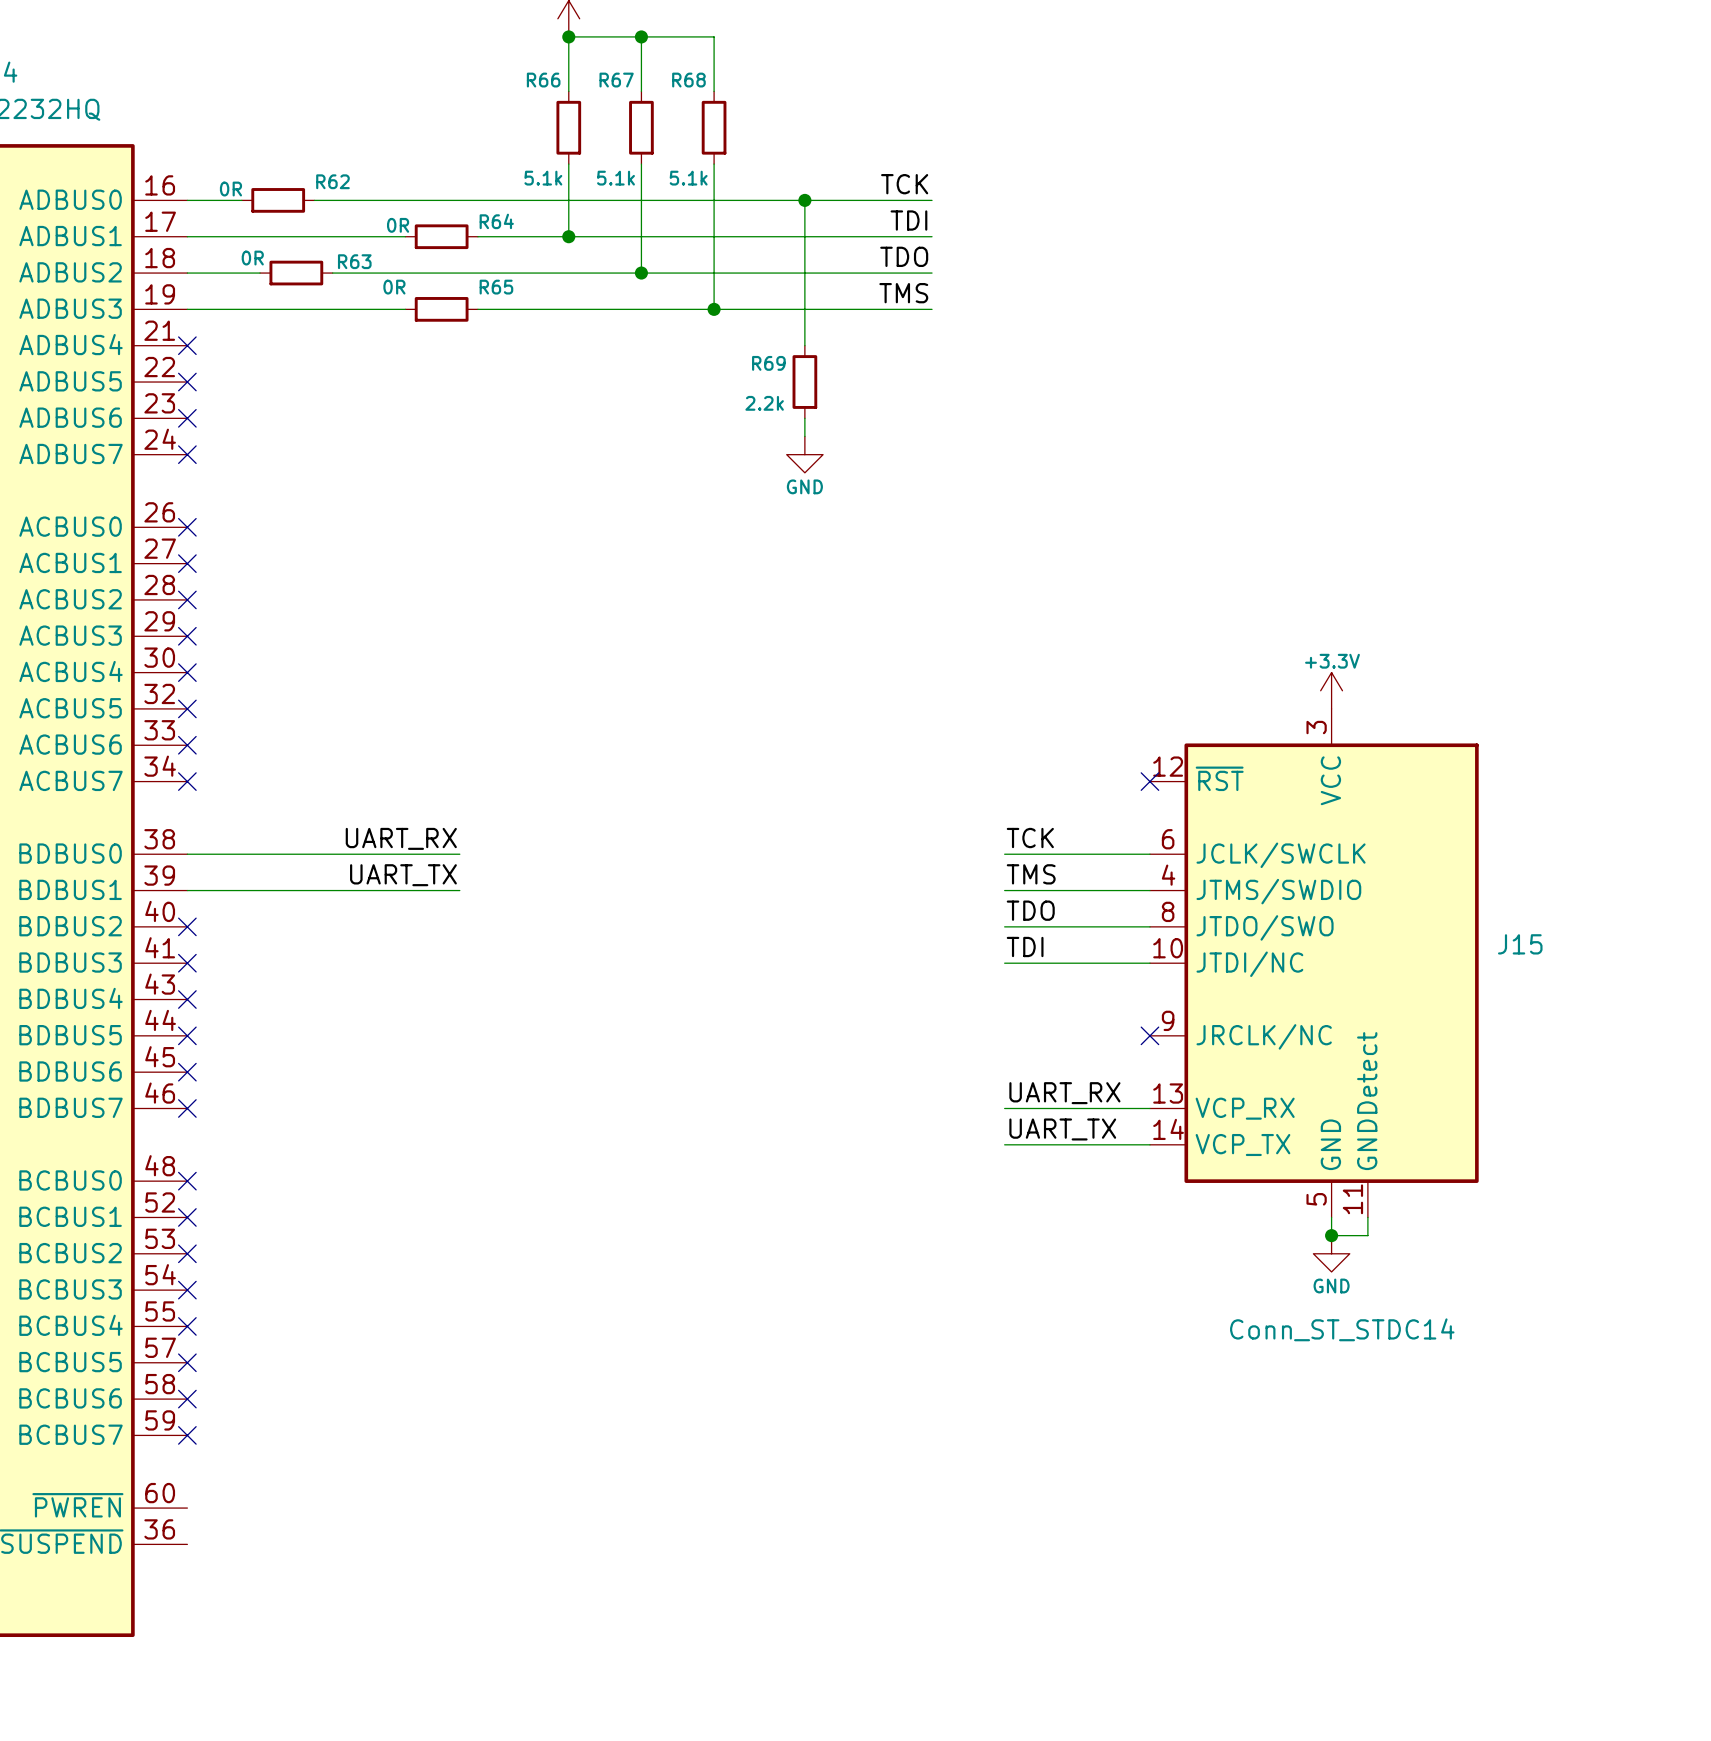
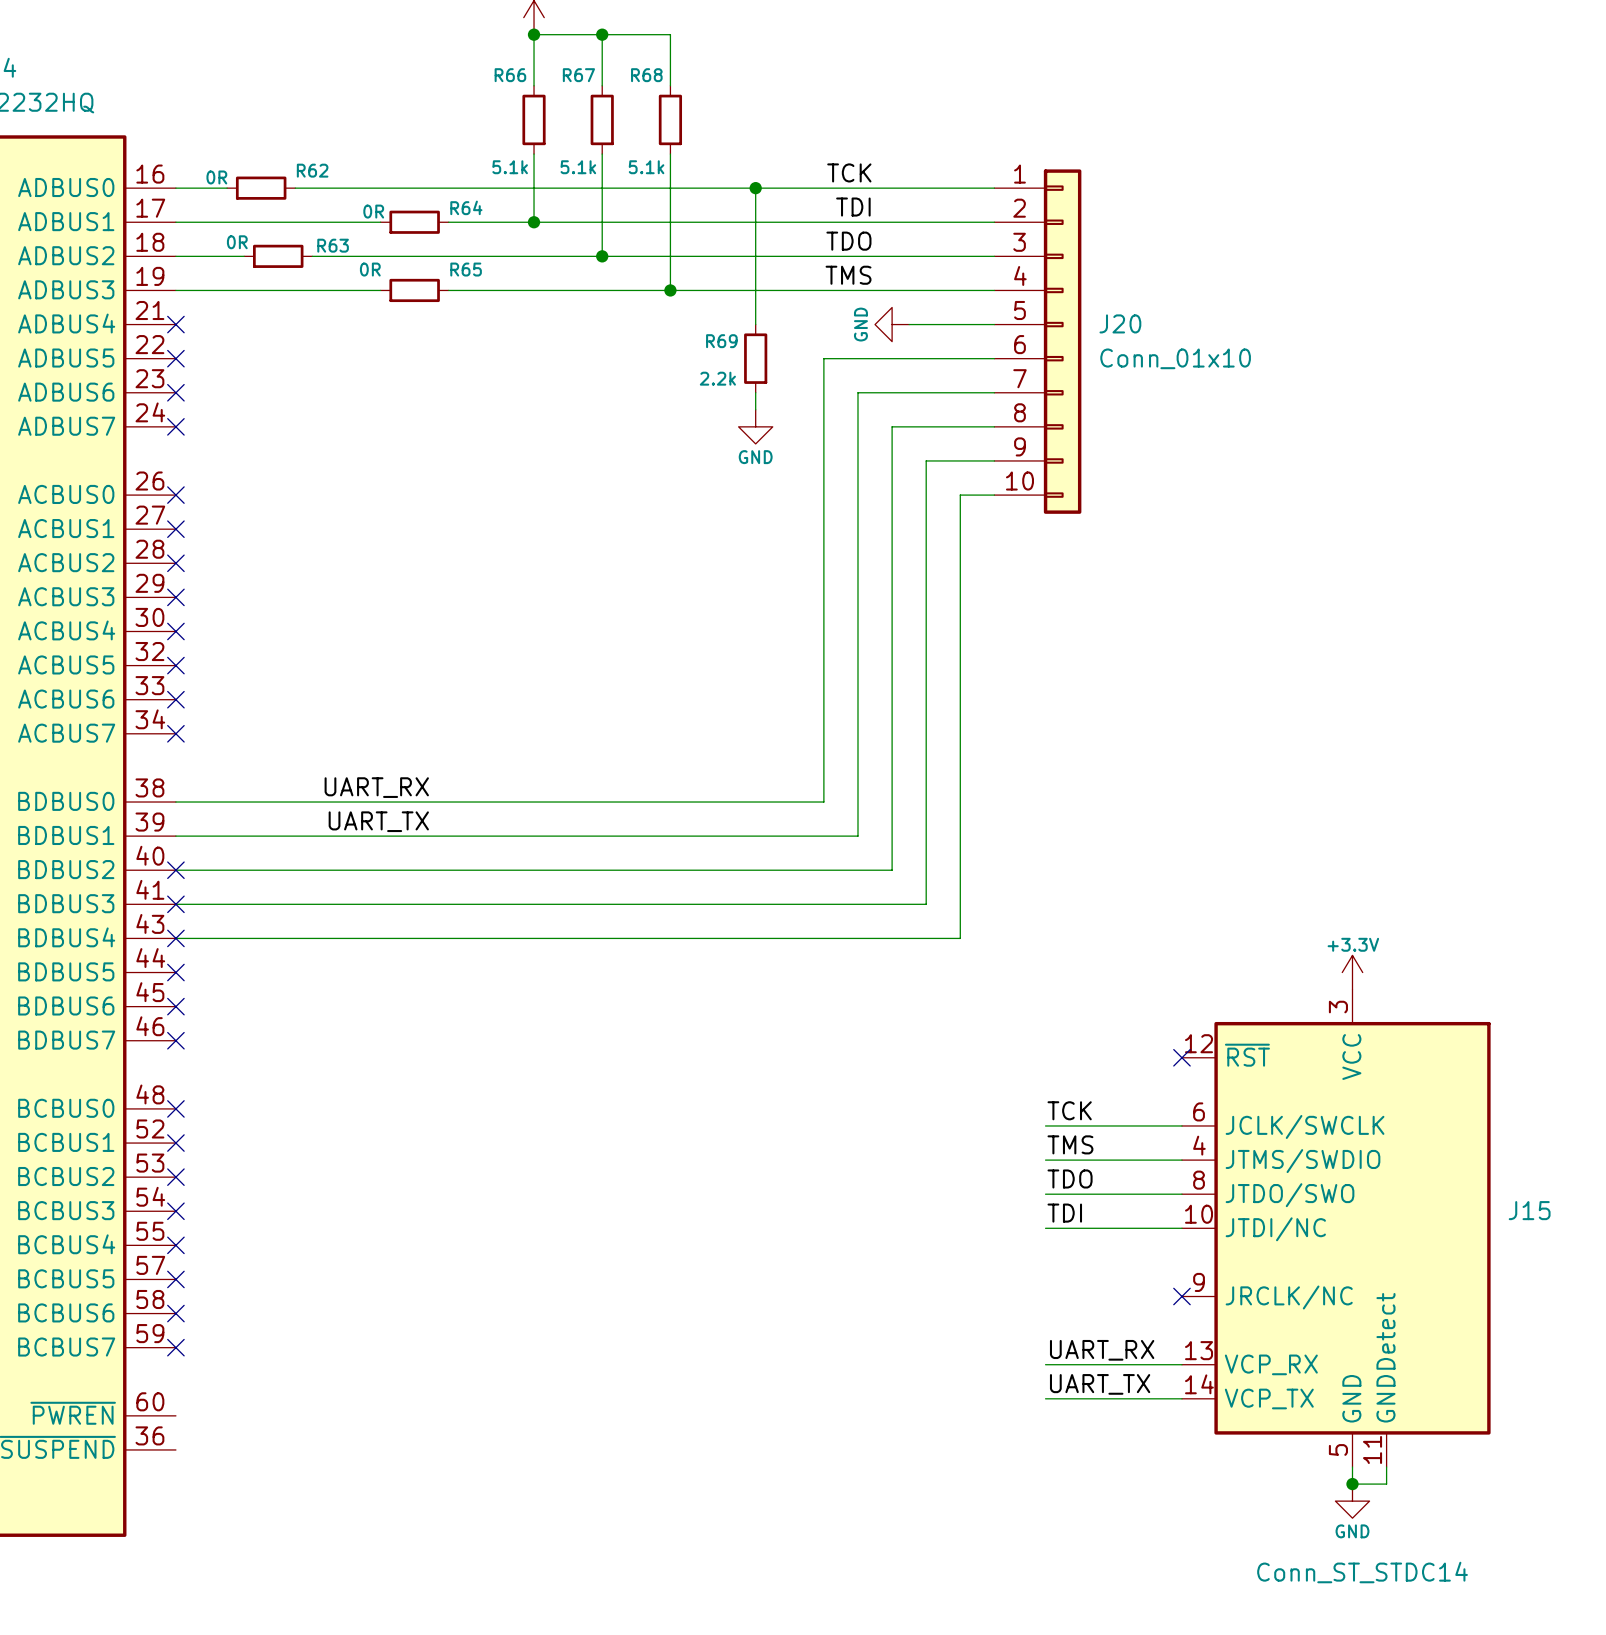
wire: none -> (875, 188) (994, 188)
wire: none -> (875, 222) (994, 222)
wire: none -> (875, 256) (994, 256)
wire: none -> (875, 290) (994, 290)
power symbol: none -> GND (892, 324)
wire: none -> (909, 324) (994, 324)
J20: none -> Conn_01x10 (1037, 341)
wire: none -> (994, 358) (823, 358) (823, 802) (431, 802)
wire: none -> (994, 392) (857, 392) (857, 836) (431, 836)
wire: none -> (994, 426) (892, 426) (892, 870) (175, 870)
wire: none -> (994, 460) (926, 460) (926, 904) (175, 904)
wire: none -> (994, 495) (960, 495) (960, 938) (175, 938)
power symbol: +3.3V (1331, 690) -> none
no-connect mark: (1149, 781) -> none
label: TCK (1030, 838) -> none
wire: (1004, 854) (1149, 854) -> none
label: TMS (1031, 874) -> none
wire: (1004, 890) (1149, 890) -> (1045, 1125) (1181, 1125)
label: TDO (1030, 910) -> none
wire: (1004, 926) (1149, 926) -> (1045, 1160) (1181, 1160)
label: TDI (1025, 946) -> none
wire: (1004, 963) (1149, 963) -> (1045, 1194) (1181, 1194)
J15 position: (1314, 963) -> (1336, 1228)
no-connect mark: (1149, 1035) -> none
power symbol: none -> +3.3V (1352, 972)
label: UART_RX (1064, 1093) -> none
wire: (1004, 1108) (1149, 1108) -> (1045, 1228) (1181, 1228)
no-connect mark: none -> (1181, 1057)
label: UART_TX (1062, 1129) -> none
wire: (1004, 1144) (1149, 1144) -> (1045, 1364) (1181, 1364)
label: none -> TCK (1069, 1110)
label: none -> TMS (1070, 1144)
junction: (1331, 1235) -> none
power symbol: GND (1331, 1253) -> none
label: none -> TDO (1070, 1178)
label: none -> TDI (1064, 1213)
no-connect mark: none -> (1181, 1296)
label: none -> UART_RX (1102, 1350)
label: none -> UART_TX (1100, 1384)
wire: none -> (1045, 1398) (1181, 1398)
wire: none -> (1352, 1467) (1352, 1484) (1386, 1484) (1386, 1467)
junction: none -> (1352, 1484)
power symbol: none -> GND (1352, 1501)

